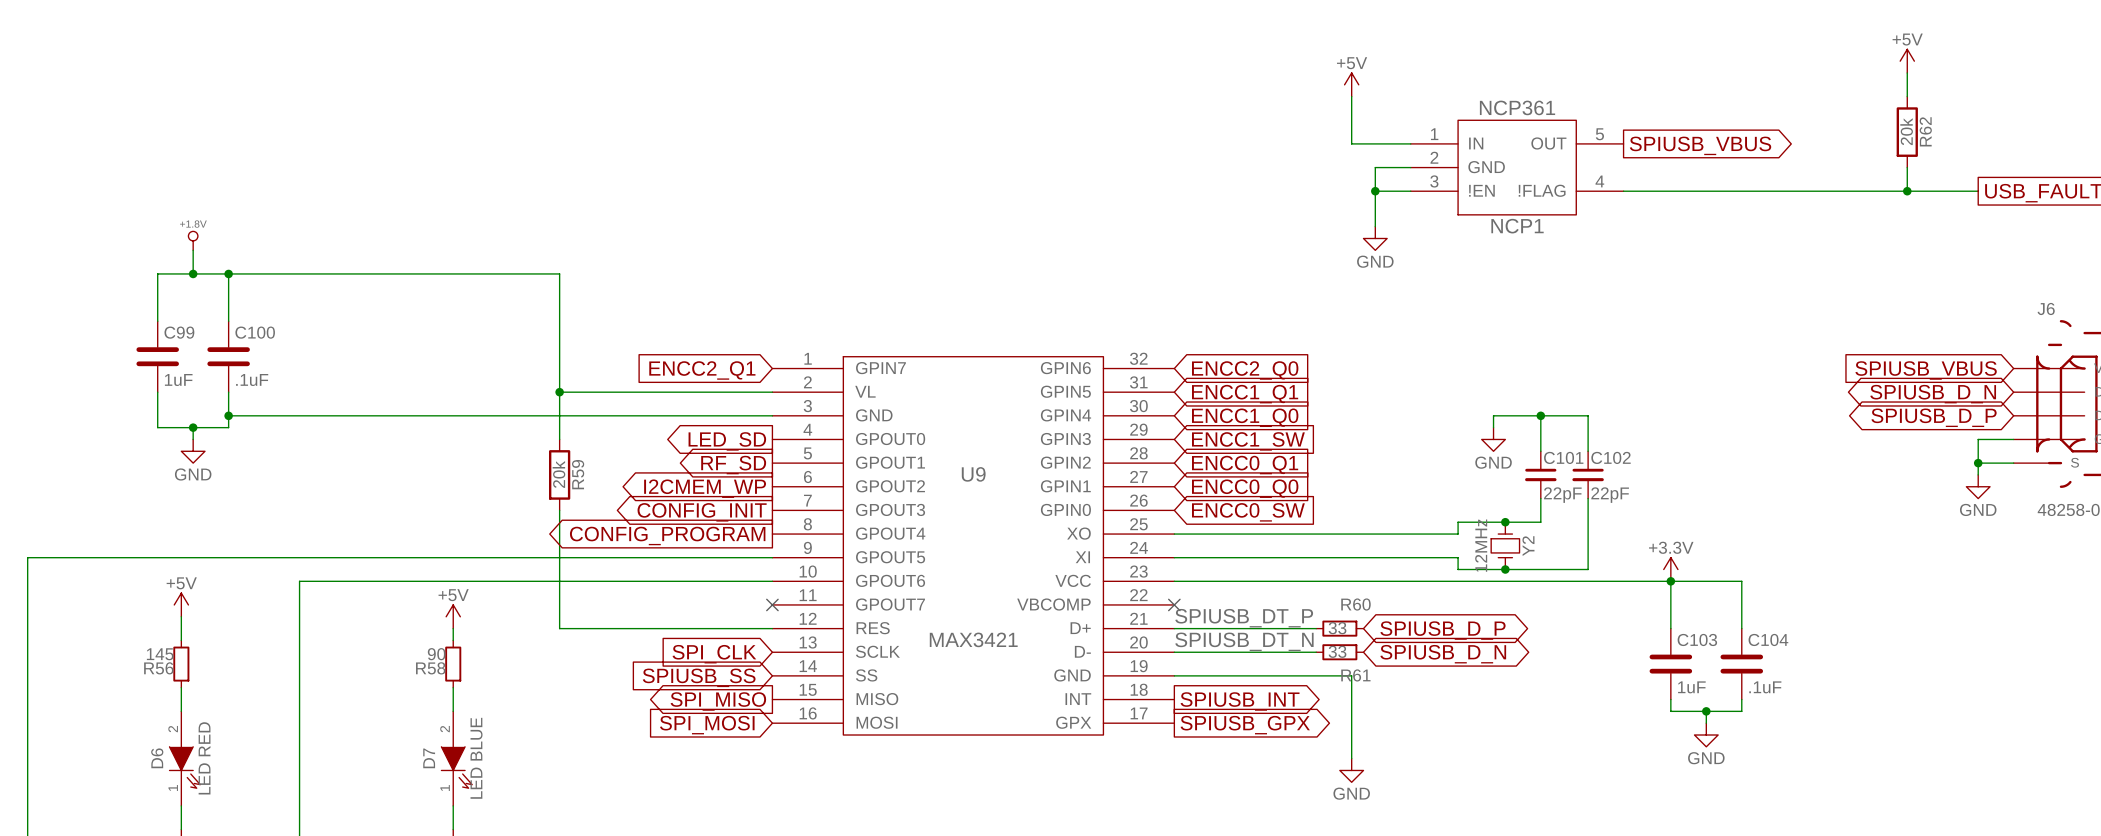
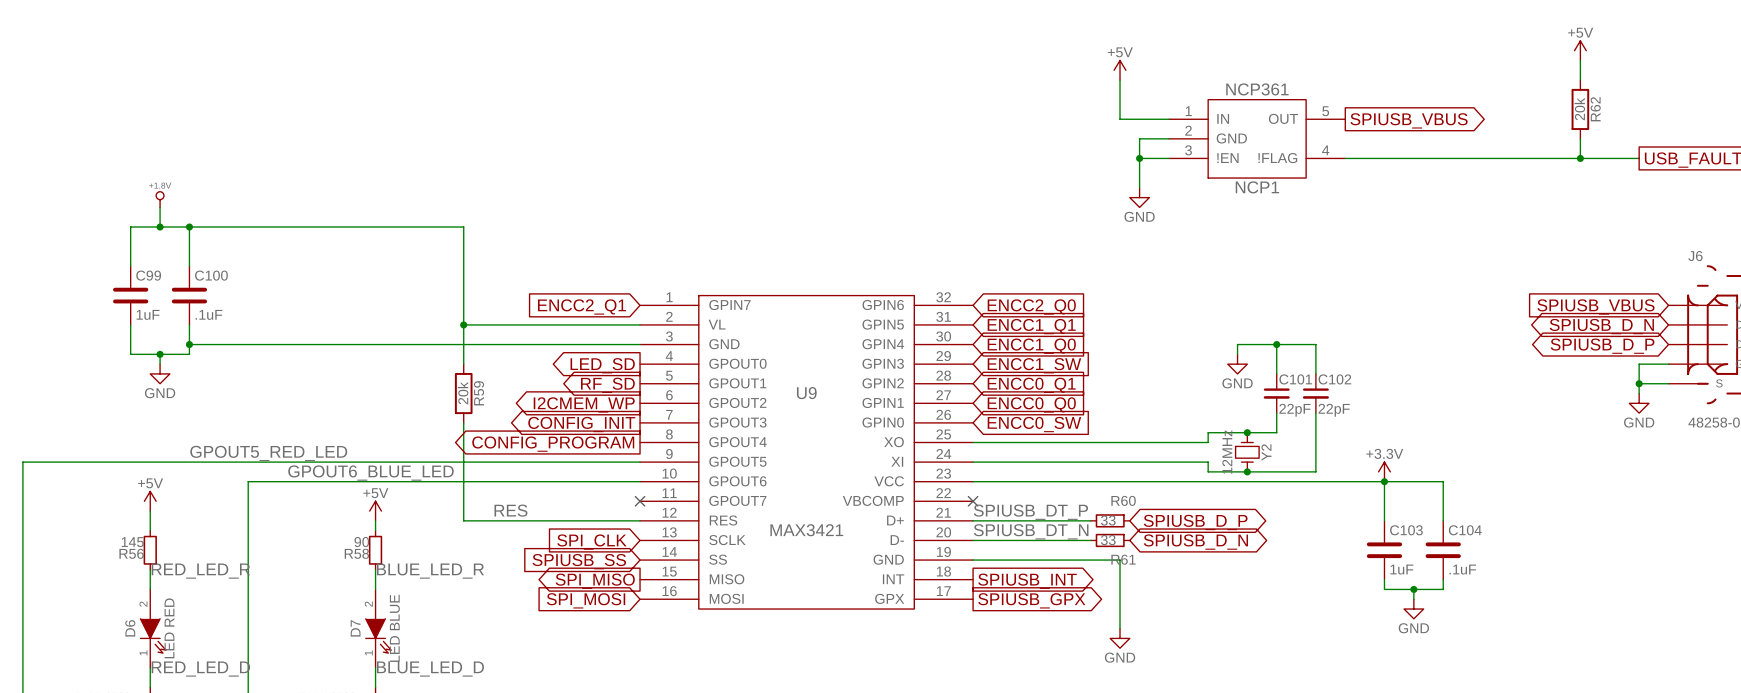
label: none -> GPOUT5_RED_LED (268, 453)
label: none -> GPOUT6_BLUE_LED (370, 473)
label: none -> RES (510, 510)
label: none -> RED_LED_R (200, 571)
label: none -> BLUE_LED_R (430, 571)
label: none -> RED_LED_D (200, 669)
label: none -> BLUE_LED_D (430, 669)

